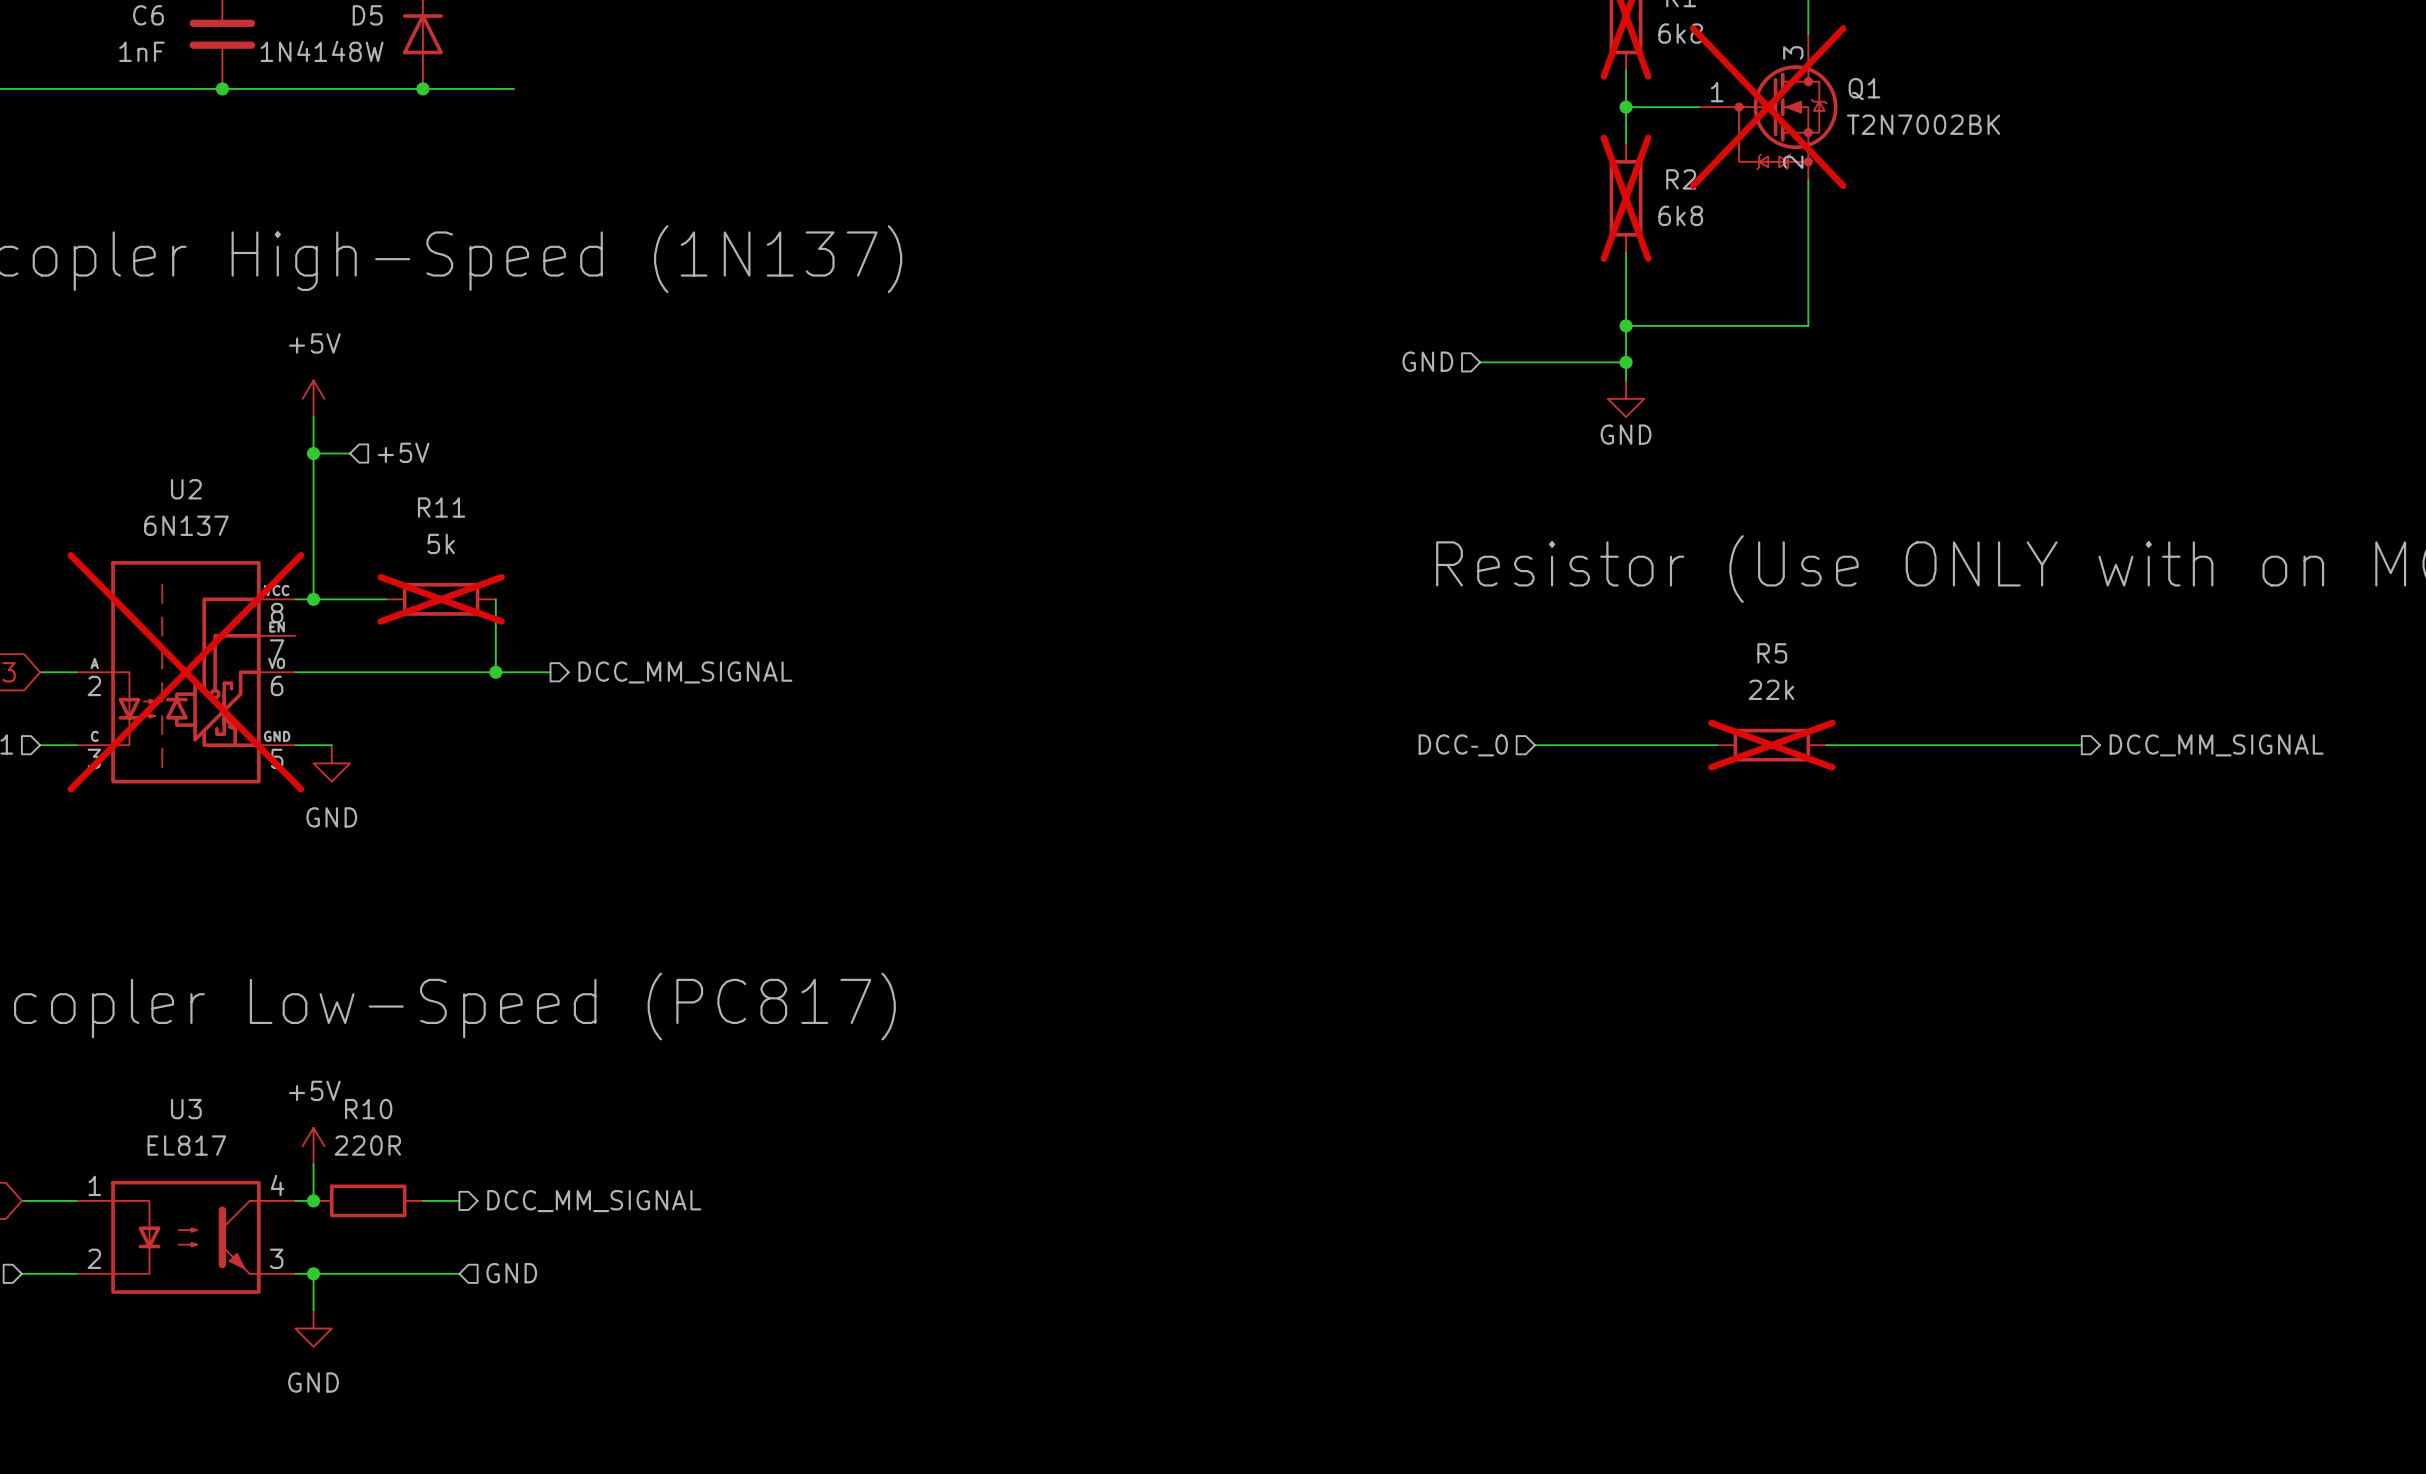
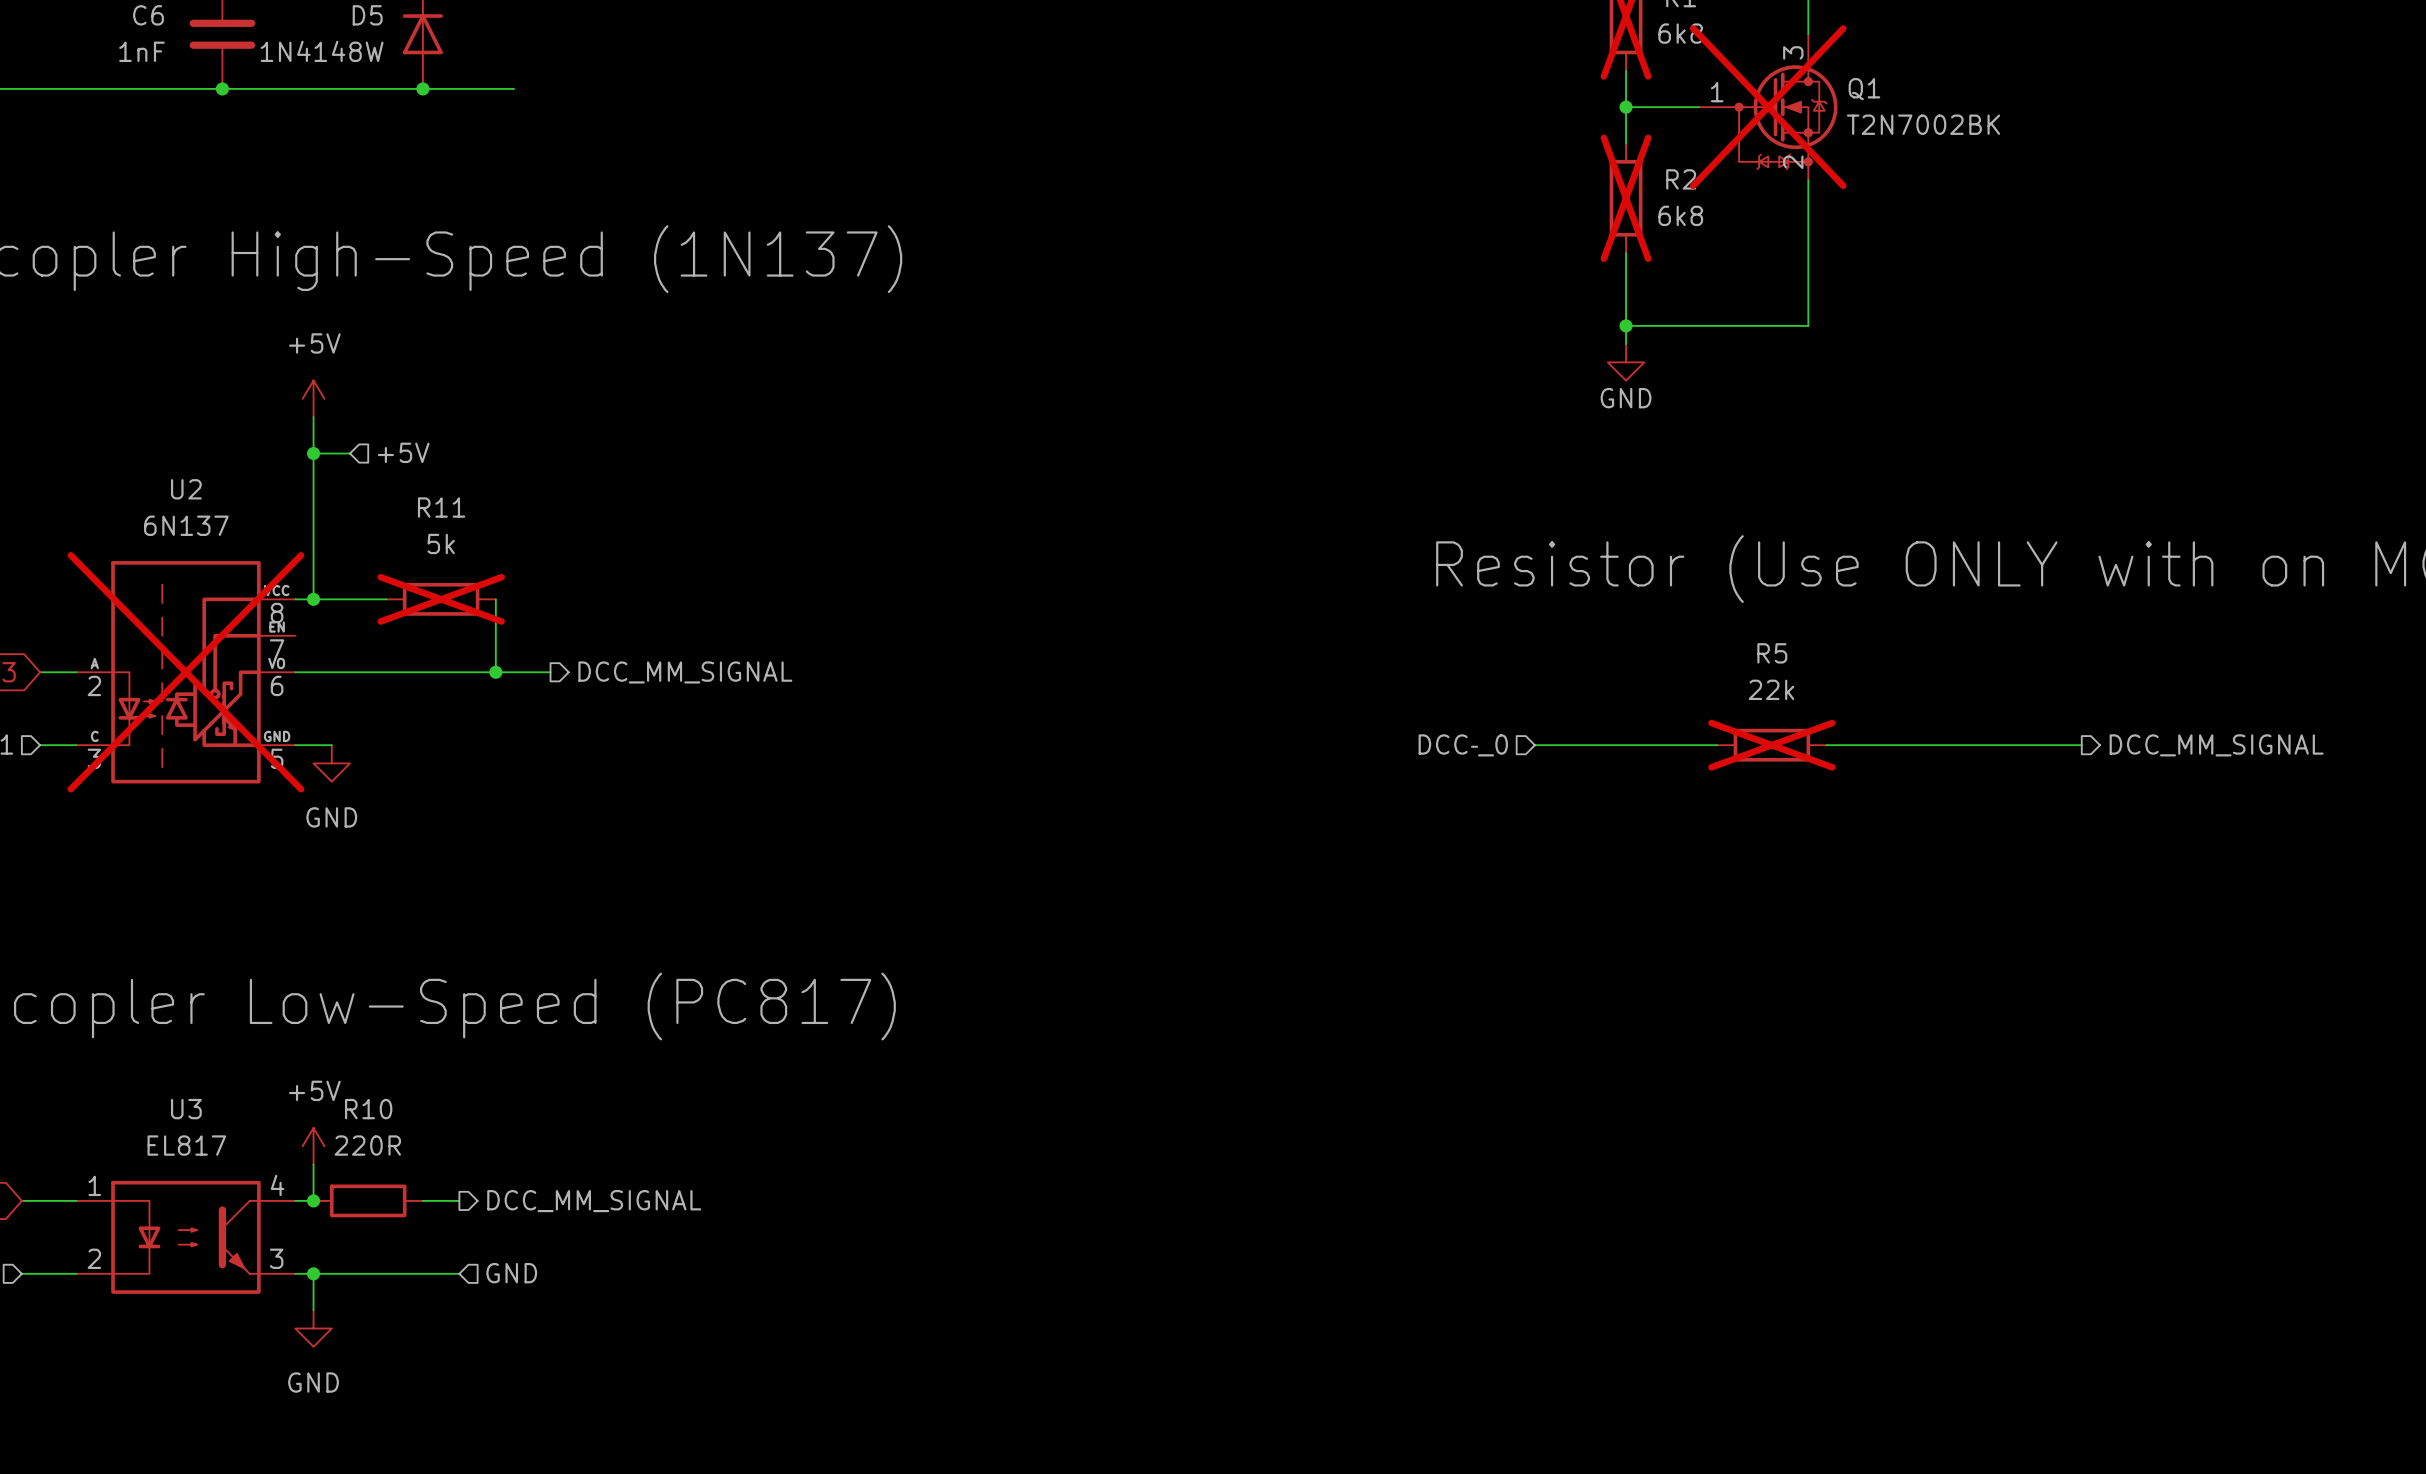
hierarchical label: GND (1427, 361) -> none
wire: (1480, 362) (1626, 362) -> none
junction: (1626, 362) -> none
power symbol position: GND (1626, 398) -> GND (1626, 362)

